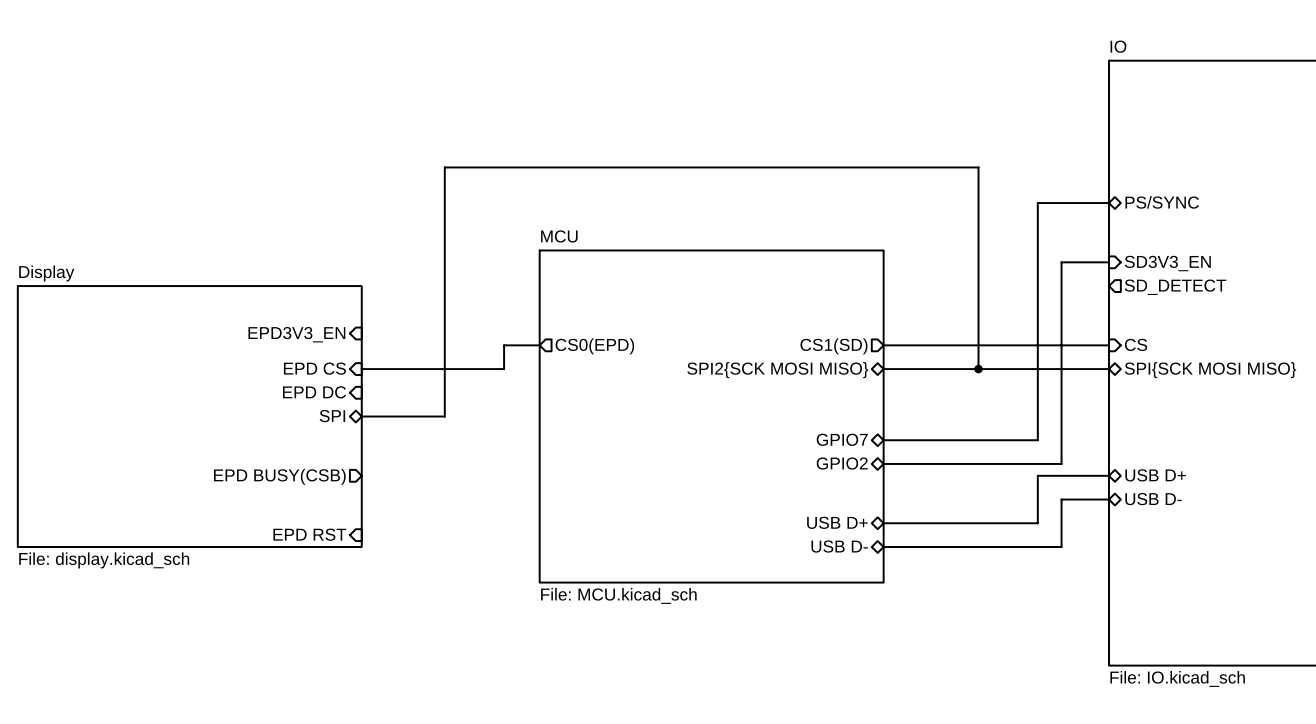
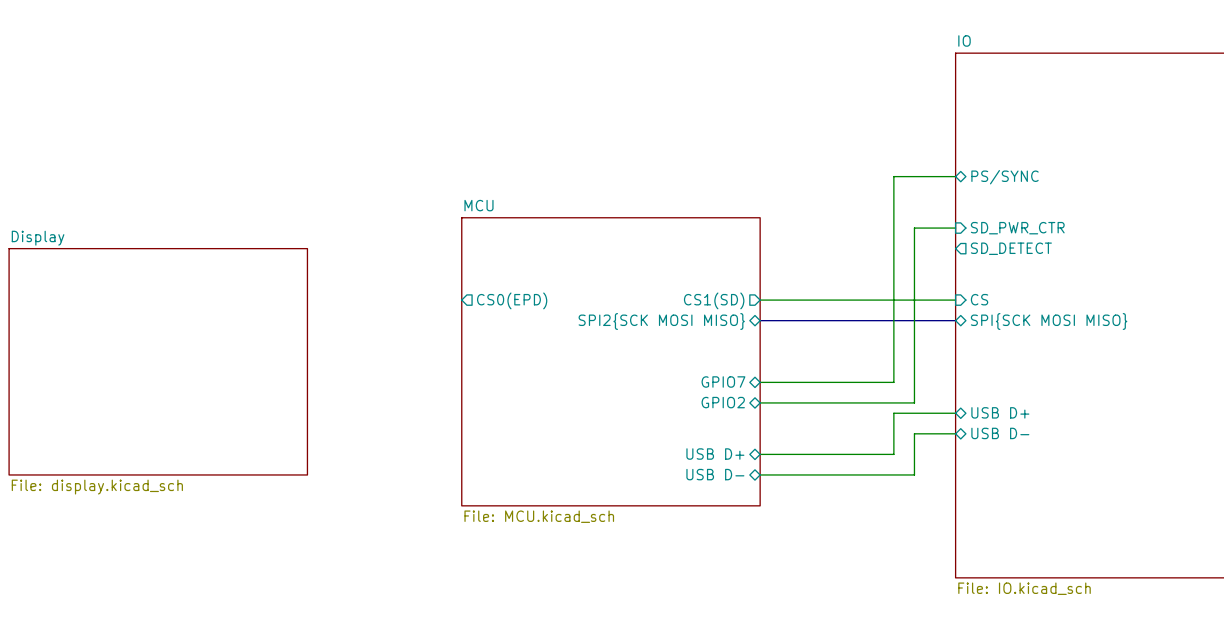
sheet pin: SD3V3_EN (1167, 263) -> SD_PWR_CTR (1017, 228)
sheet pin: EPD3V3_EN (296, 334) -> none
wire: (539, 345) (504, 345) (504, 369) (361, 369) -> none
sheet pin: EPD CS (314, 368) -> none
bus: (978, 369) (978, 167) (444, 167) (444, 416) (361, 416) -> none
junction: (978, 369) -> none
sheet pin: EPD DC (314, 392) -> none
sheet pin: SPI (332, 416) -> none
sheet pin: EPD BUSY(CSB) (279, 476) -> none
sheet pin: EPD RST (309, 534) -> none

